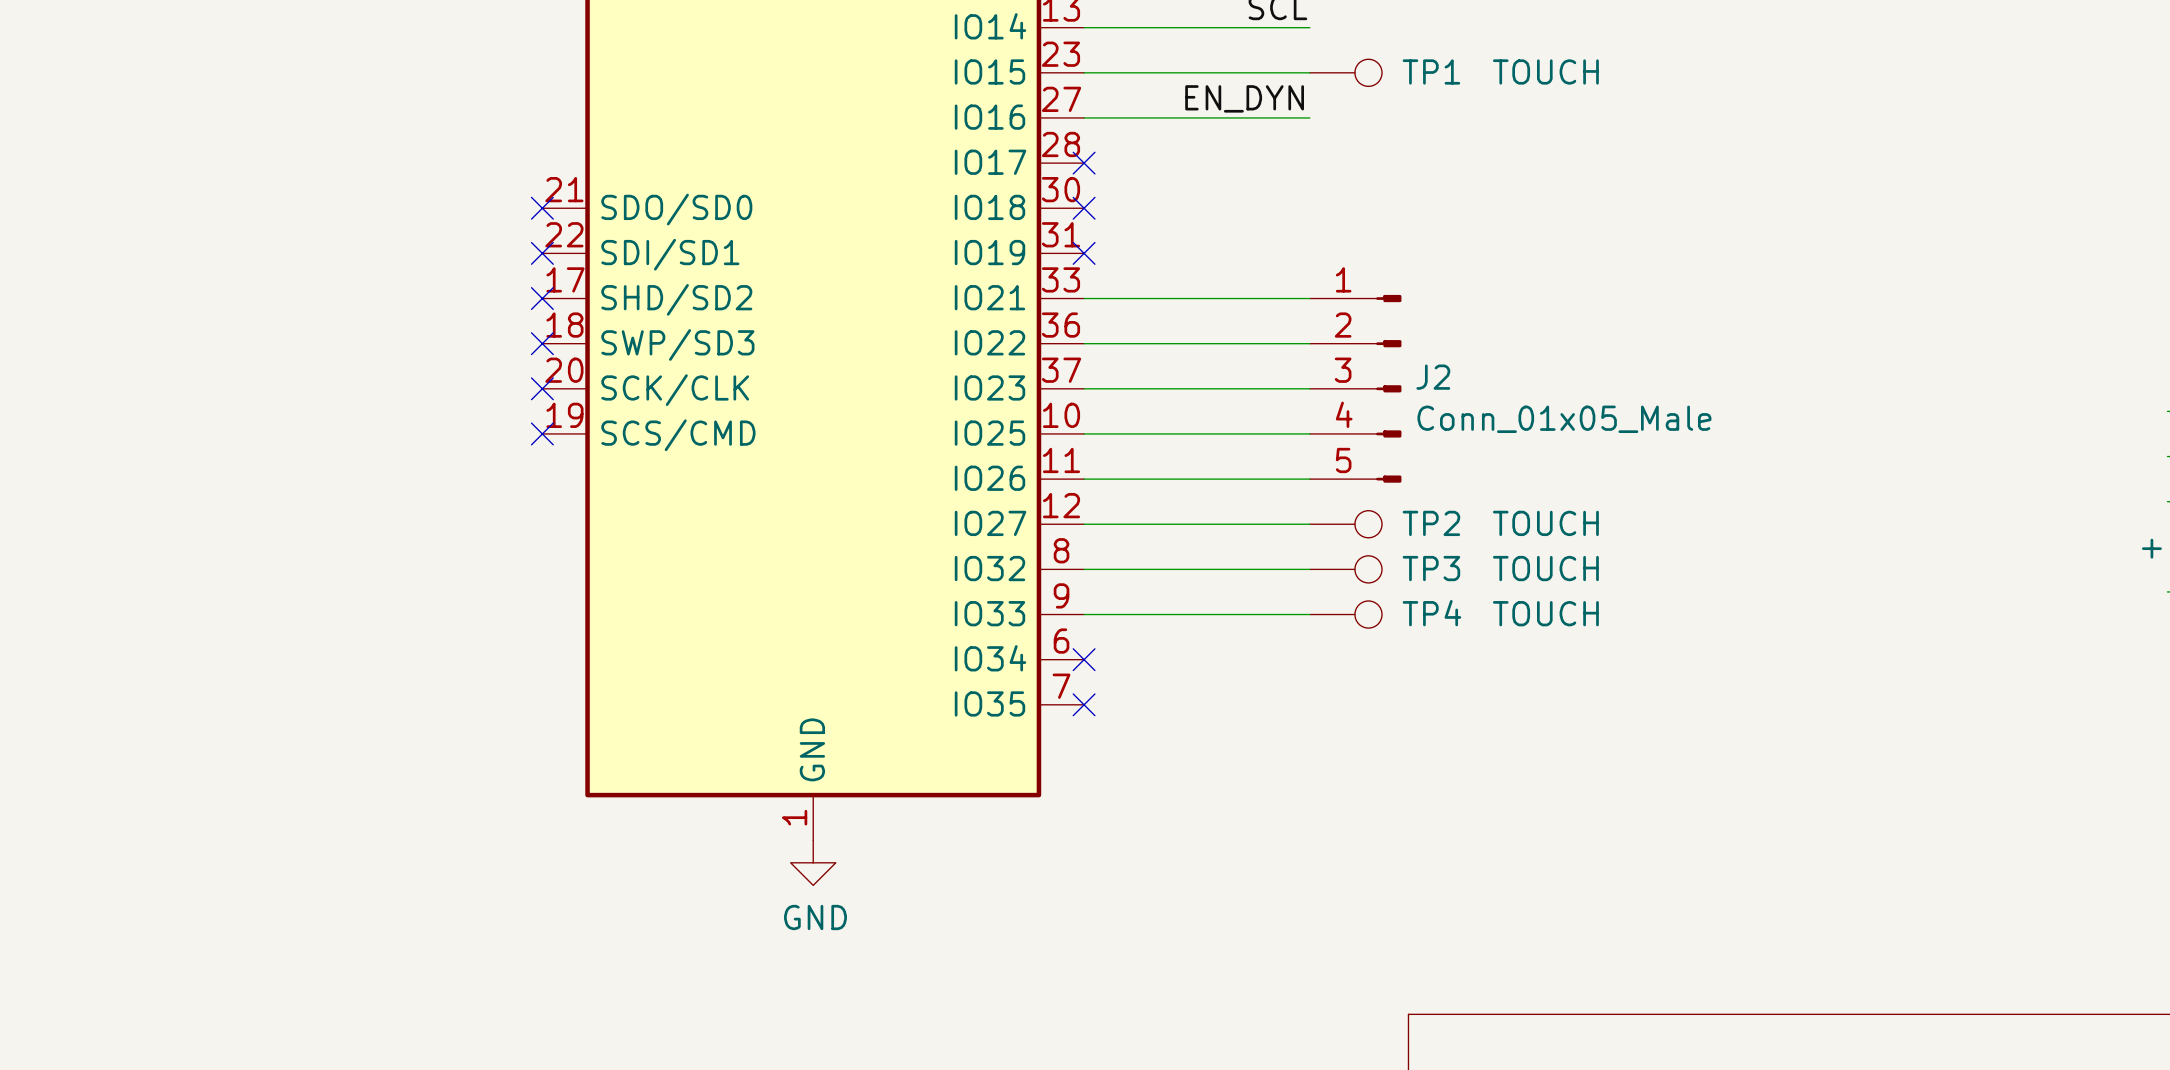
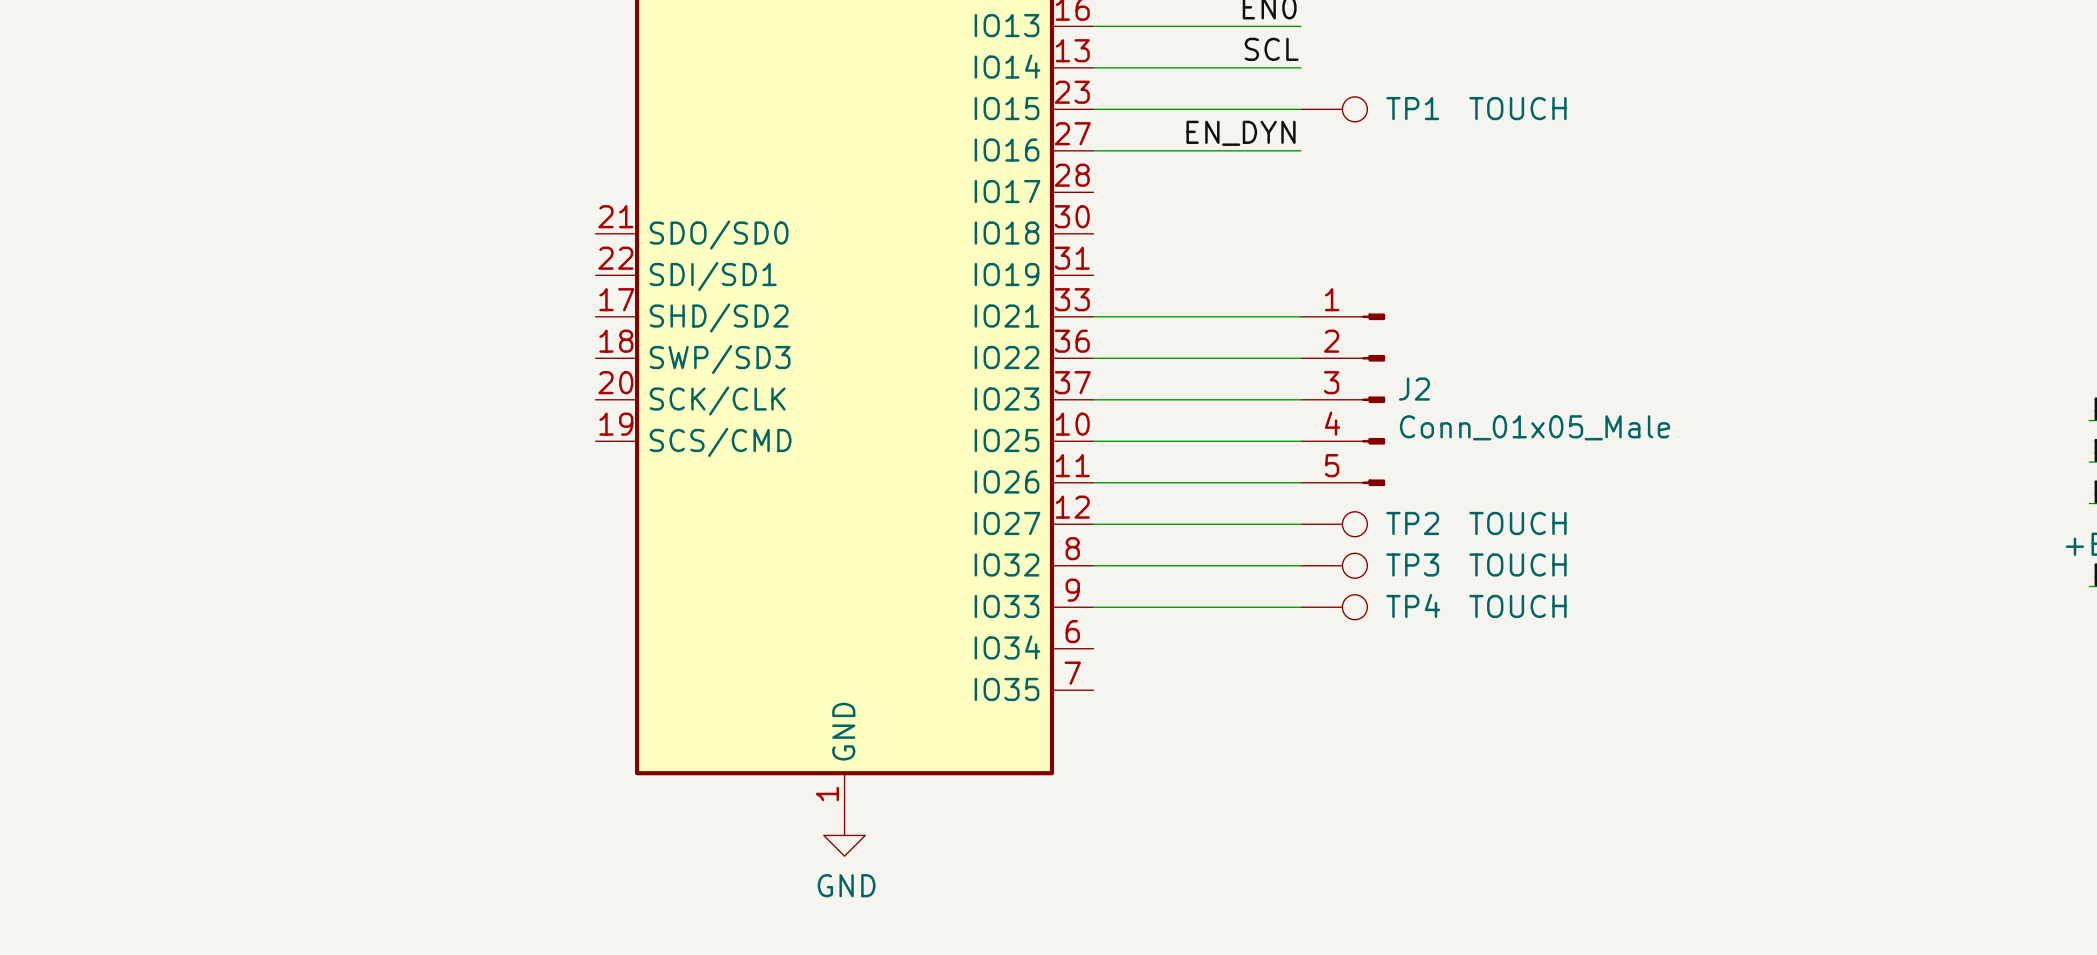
no-connect mark: (1084, 163) -> none
no-connect mark: (542, 208) -> none
no-connect mark: (1084, 208) -> none
no-connect mark: (542, 253) -> none
no-connect mark: (1084, 253) -> none
no-connect mark: (542, 298) -> none
no-connect mark: (542, 343) -> none
no-connect mark: (542, 388) -> none
no-connect mark: (542, 433) -> none
no-connect mark: (1084, 659) -> none
no-connect mark: (1084, 704) -> none

